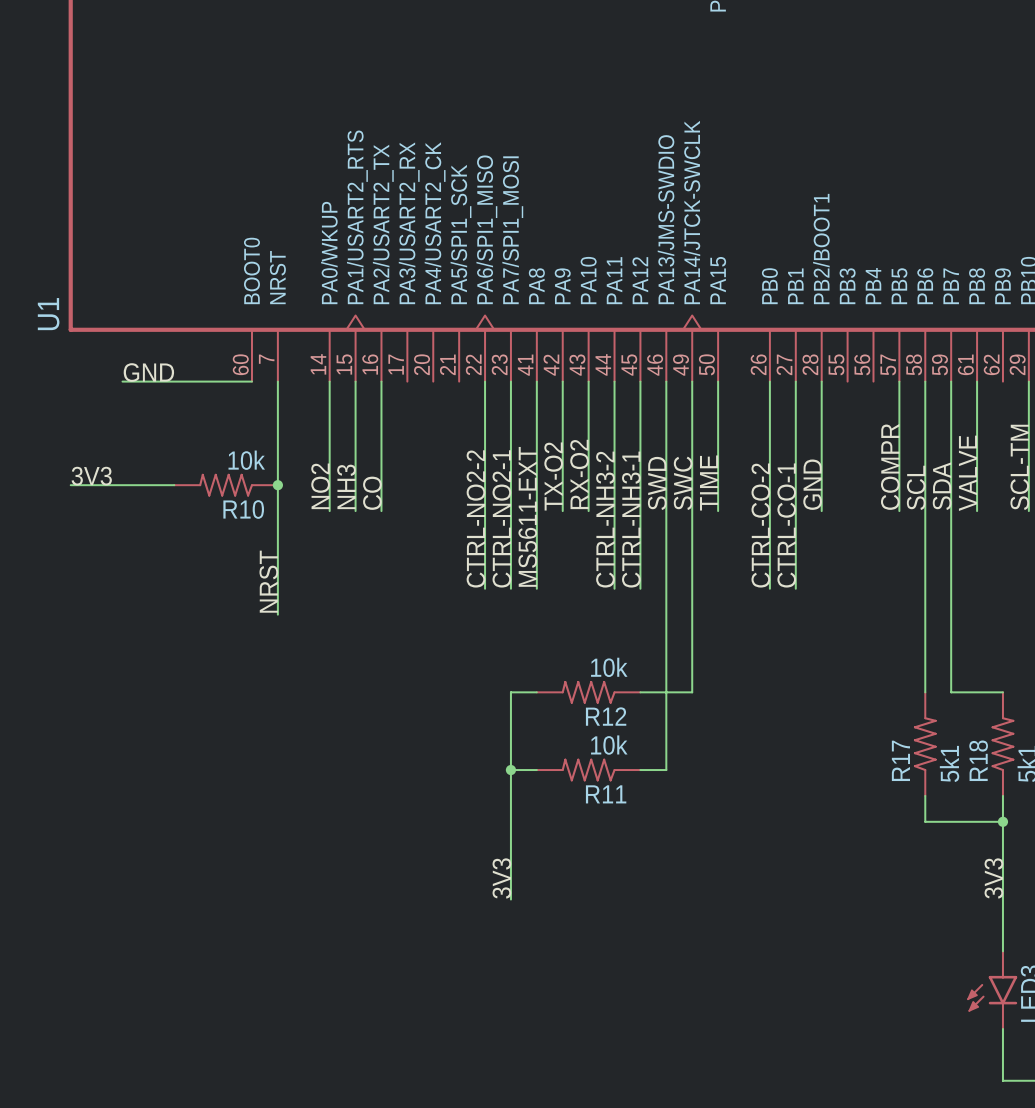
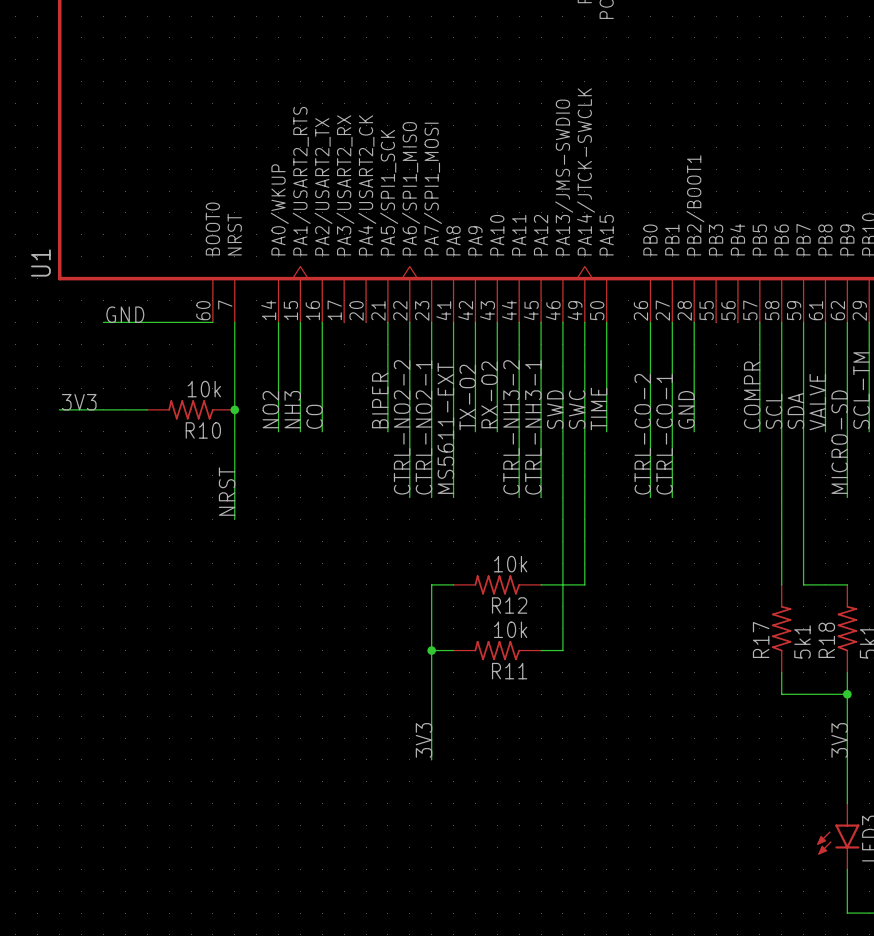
wire: none -> (387, 322) (387, 431)
wire: none -> (847, 322) (847, 497)
label: none -> BIPER (380, 400)
label: none -> MICRO-SD (839, 442)

